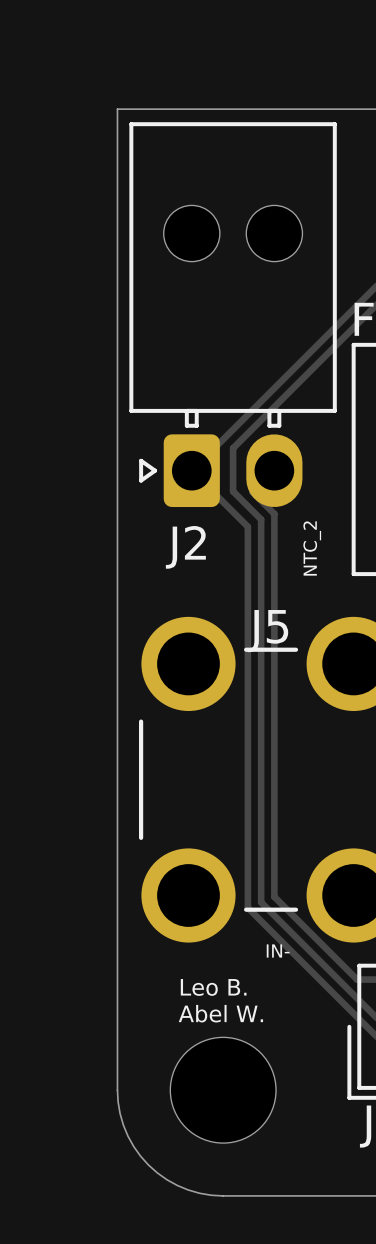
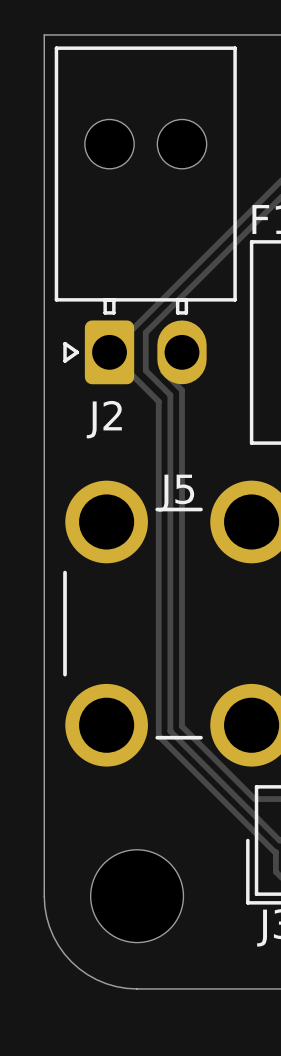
text: NTC_2 (312, 548) -> none
text: IN- (278, 950) -> none
text: Leo B. (213, 987) -> none
text: Abel W. (220, 1013) -> none

